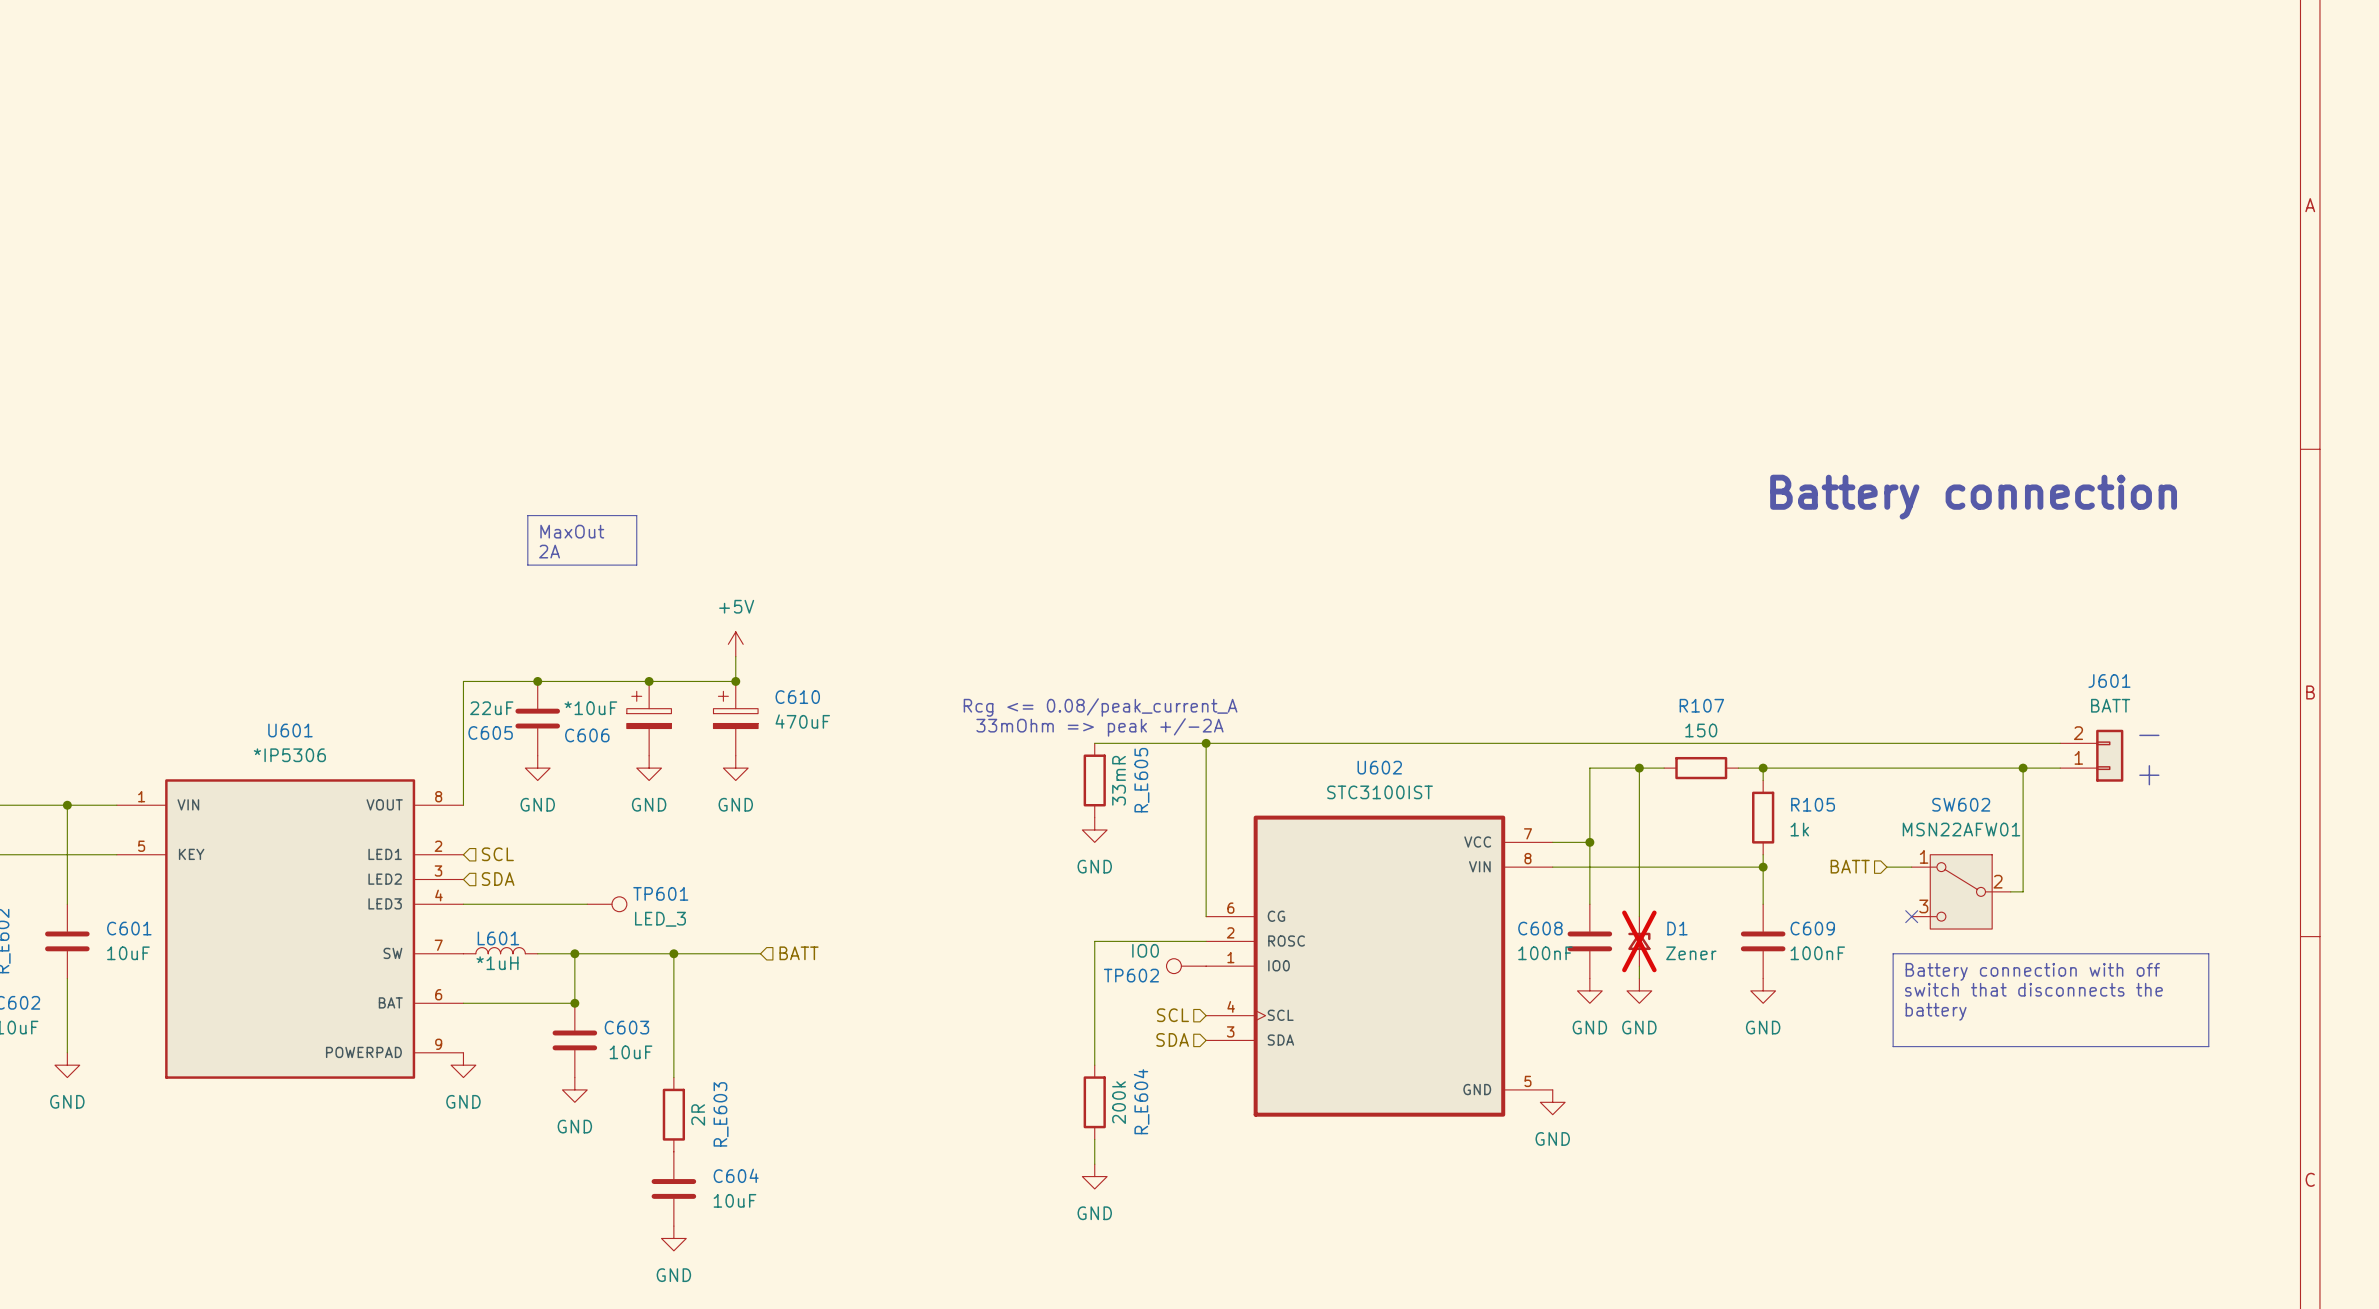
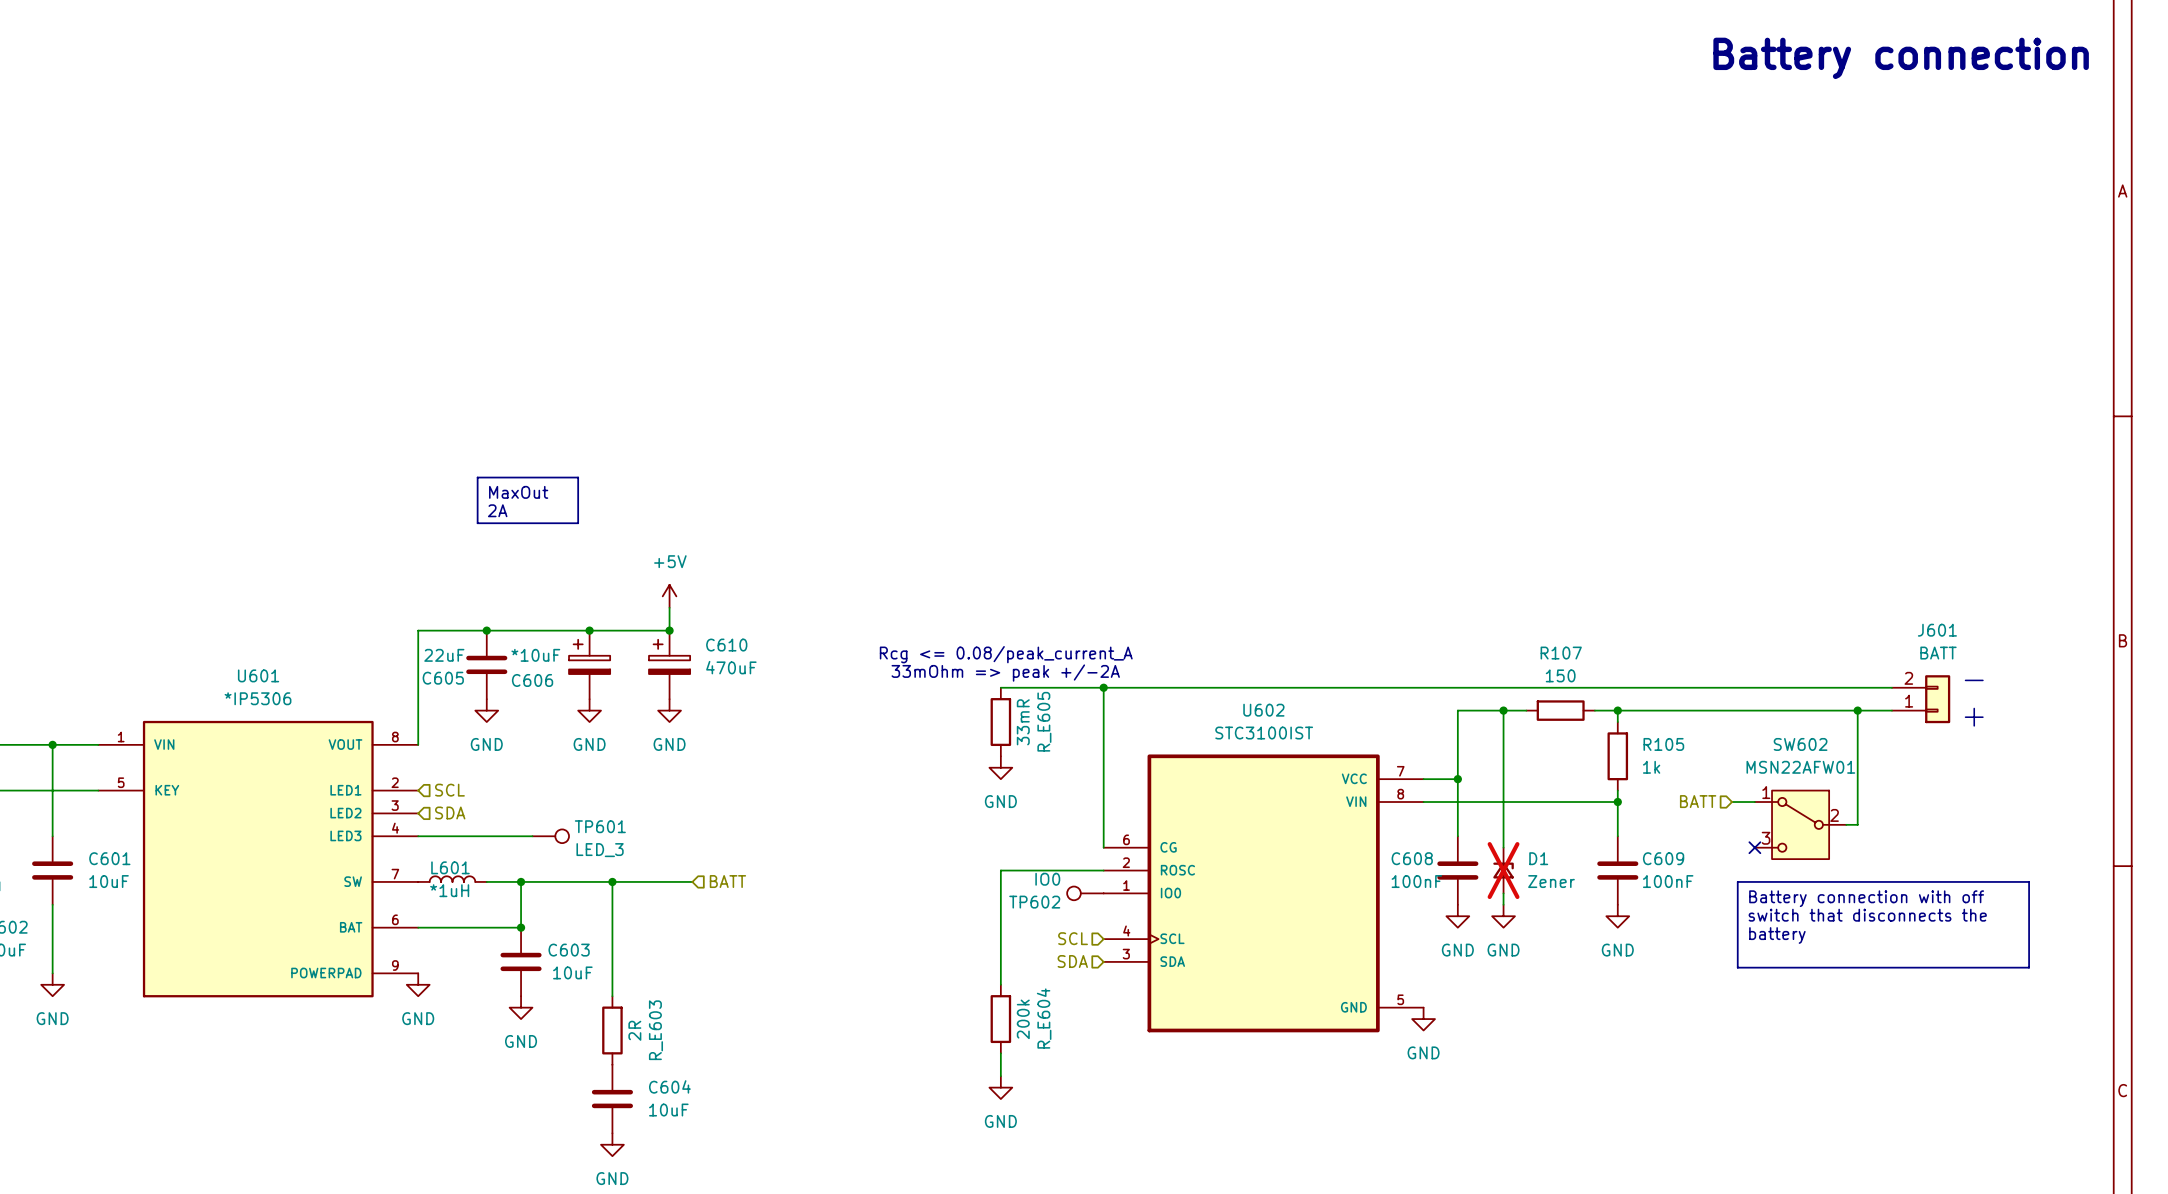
text: none -> Battery connection (1901, 58)
text: Battery connection (1973, 497) -> none

